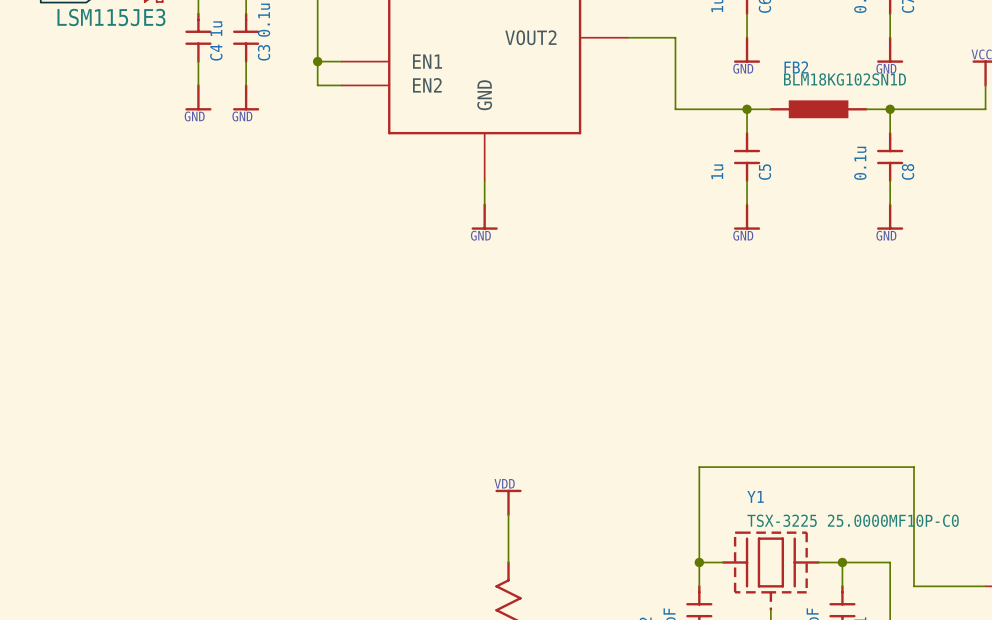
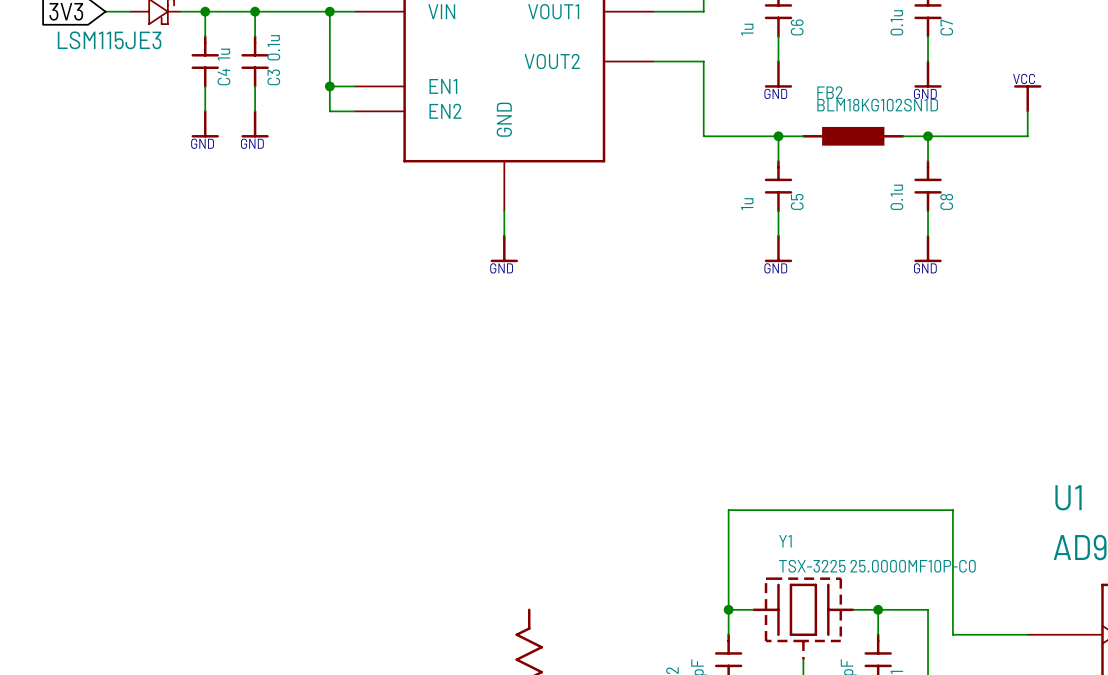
power symbol: (508, 502) -> none
wire: (508, 514) (508, 562) -> none

